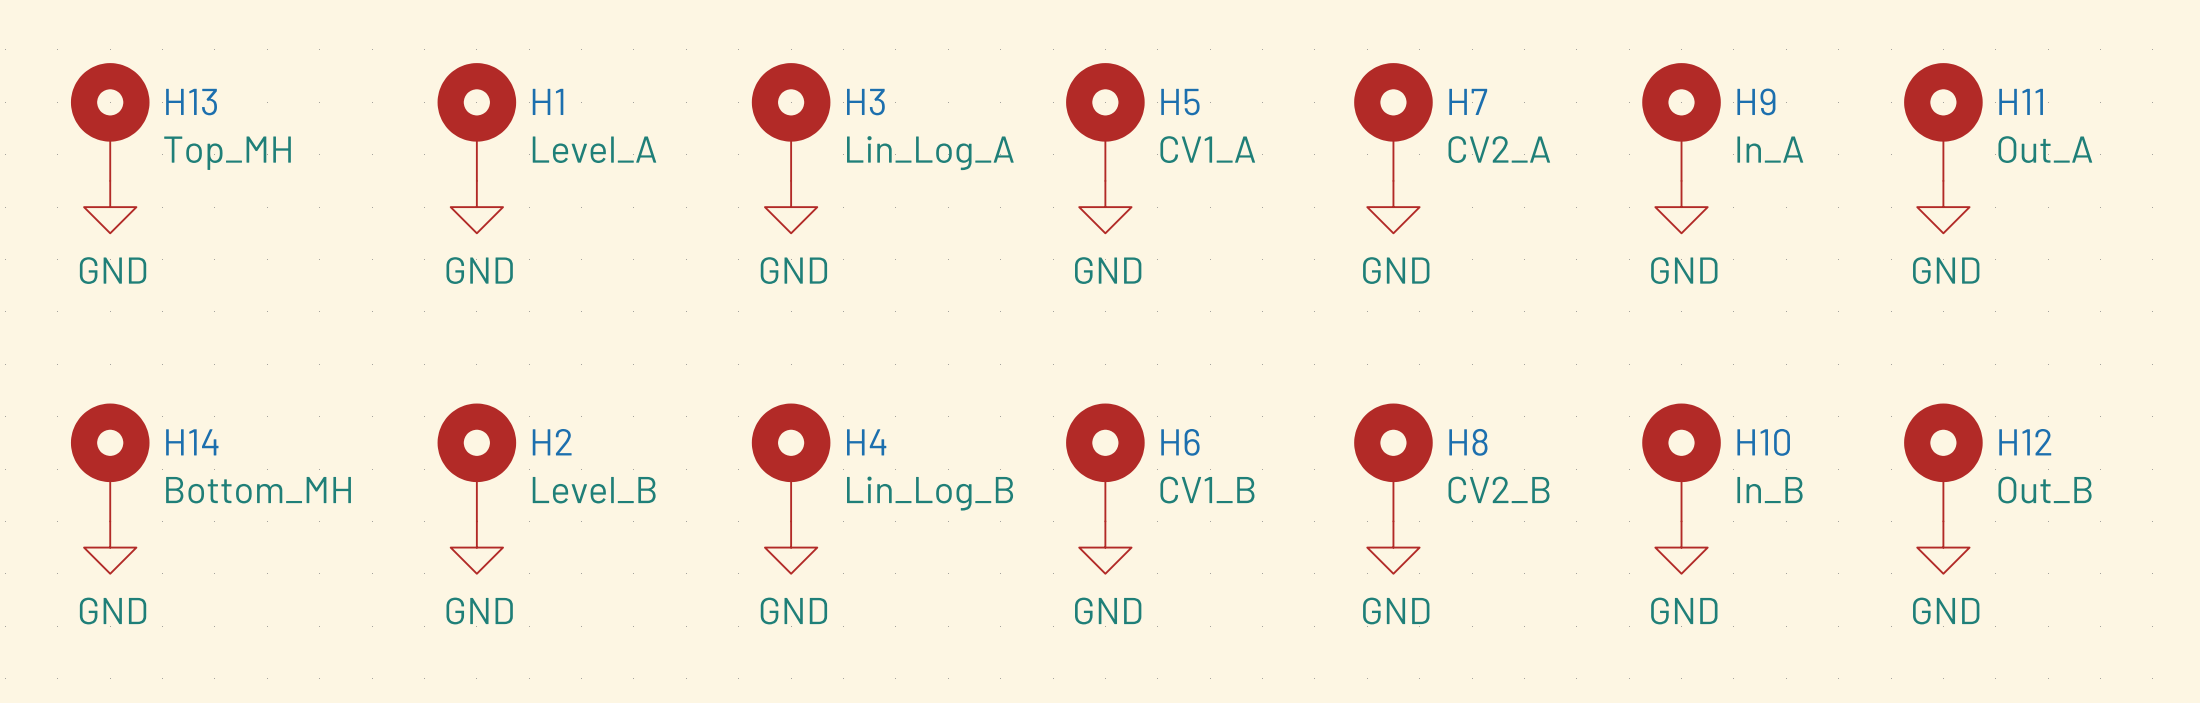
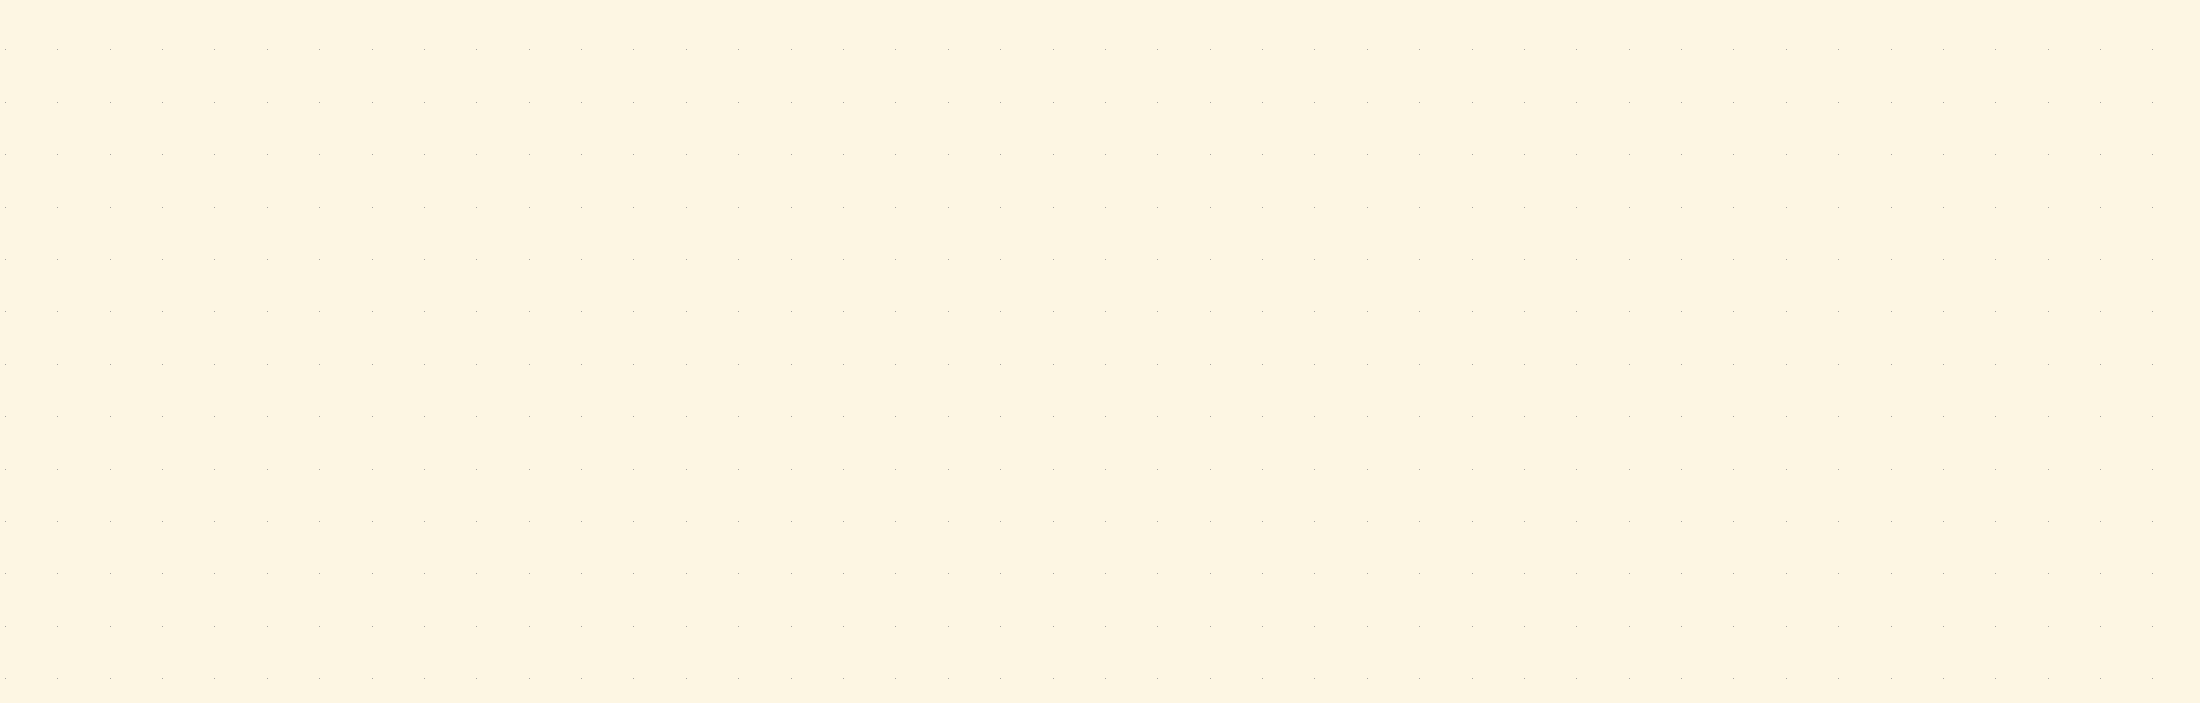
H13: Top_MH (110, 122) -> none
H1: Level_A (476, 122) -> none
H3: Lin_Log_A (791, 122) -> none
H5: CV1_A (1105, 122) -> none
H7: CV2_A (1393, 122) -> none
H9: In_A (1681, 122) -> none
H11: Out_A (1943, 122) -> none
power symbol: GND (110, 207) -> none
power symbol: GND (476, 207) -> none
power symbol: GND (791, 207) -> none
power symbol: GND (1105, 207) -> none
power symbol: GND (1393, 207) -> none
power symbol: GND (1681, 207) -> none
power symbol: GND (1943, 207) -> none
H14: Bottom_MH (110, 462) -> none
H2: Level_B (476, 462) -> none
H4: Lin_Log_B (791, 462) -> none
H6: CV1_B (1105, 462) -> none
H8: CV2_B (1393, 462) -> none
H10: In_B (1681, 462) -> none
H12: Out_B (1943, 462) -> none
power symbol: GND (110, 547) -> none
power symbol: GND (476, 547) -> none
power symbol: GND (791, 547) -> none
power symbol: GND (1105, 547) -> none
power symbol: GND (1393, 547) -> none
power symbol: GND (1681, 547) -> none
power symbol: GND (1943, 547) -> none

